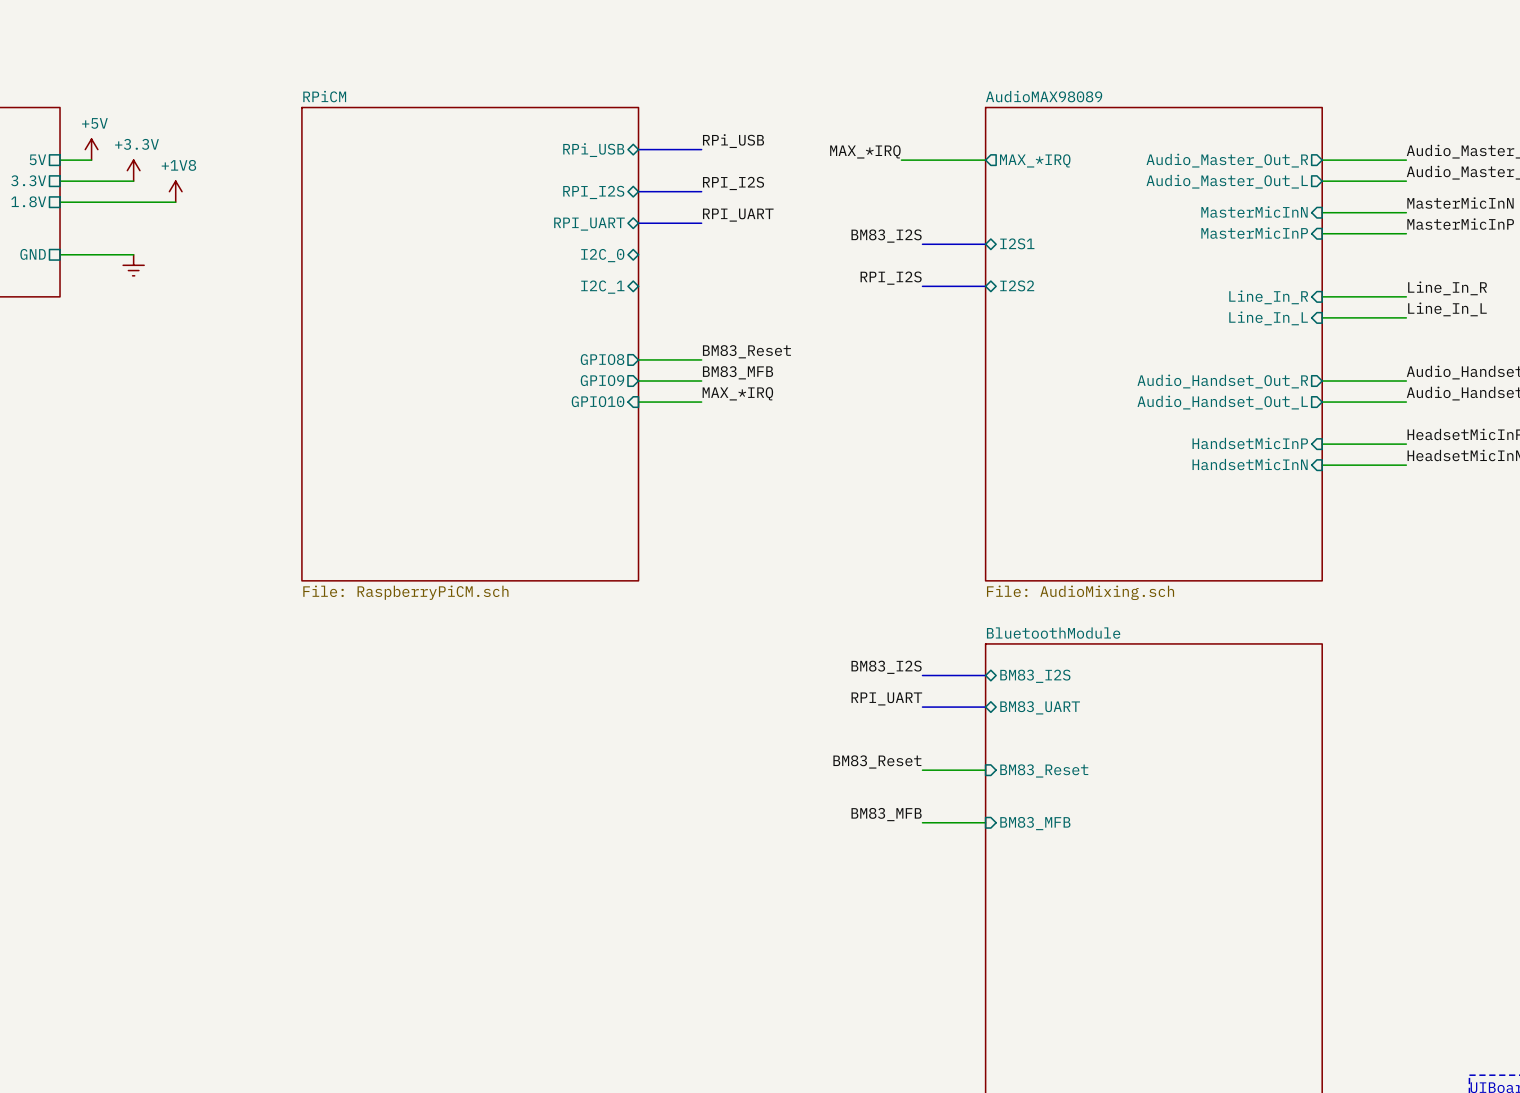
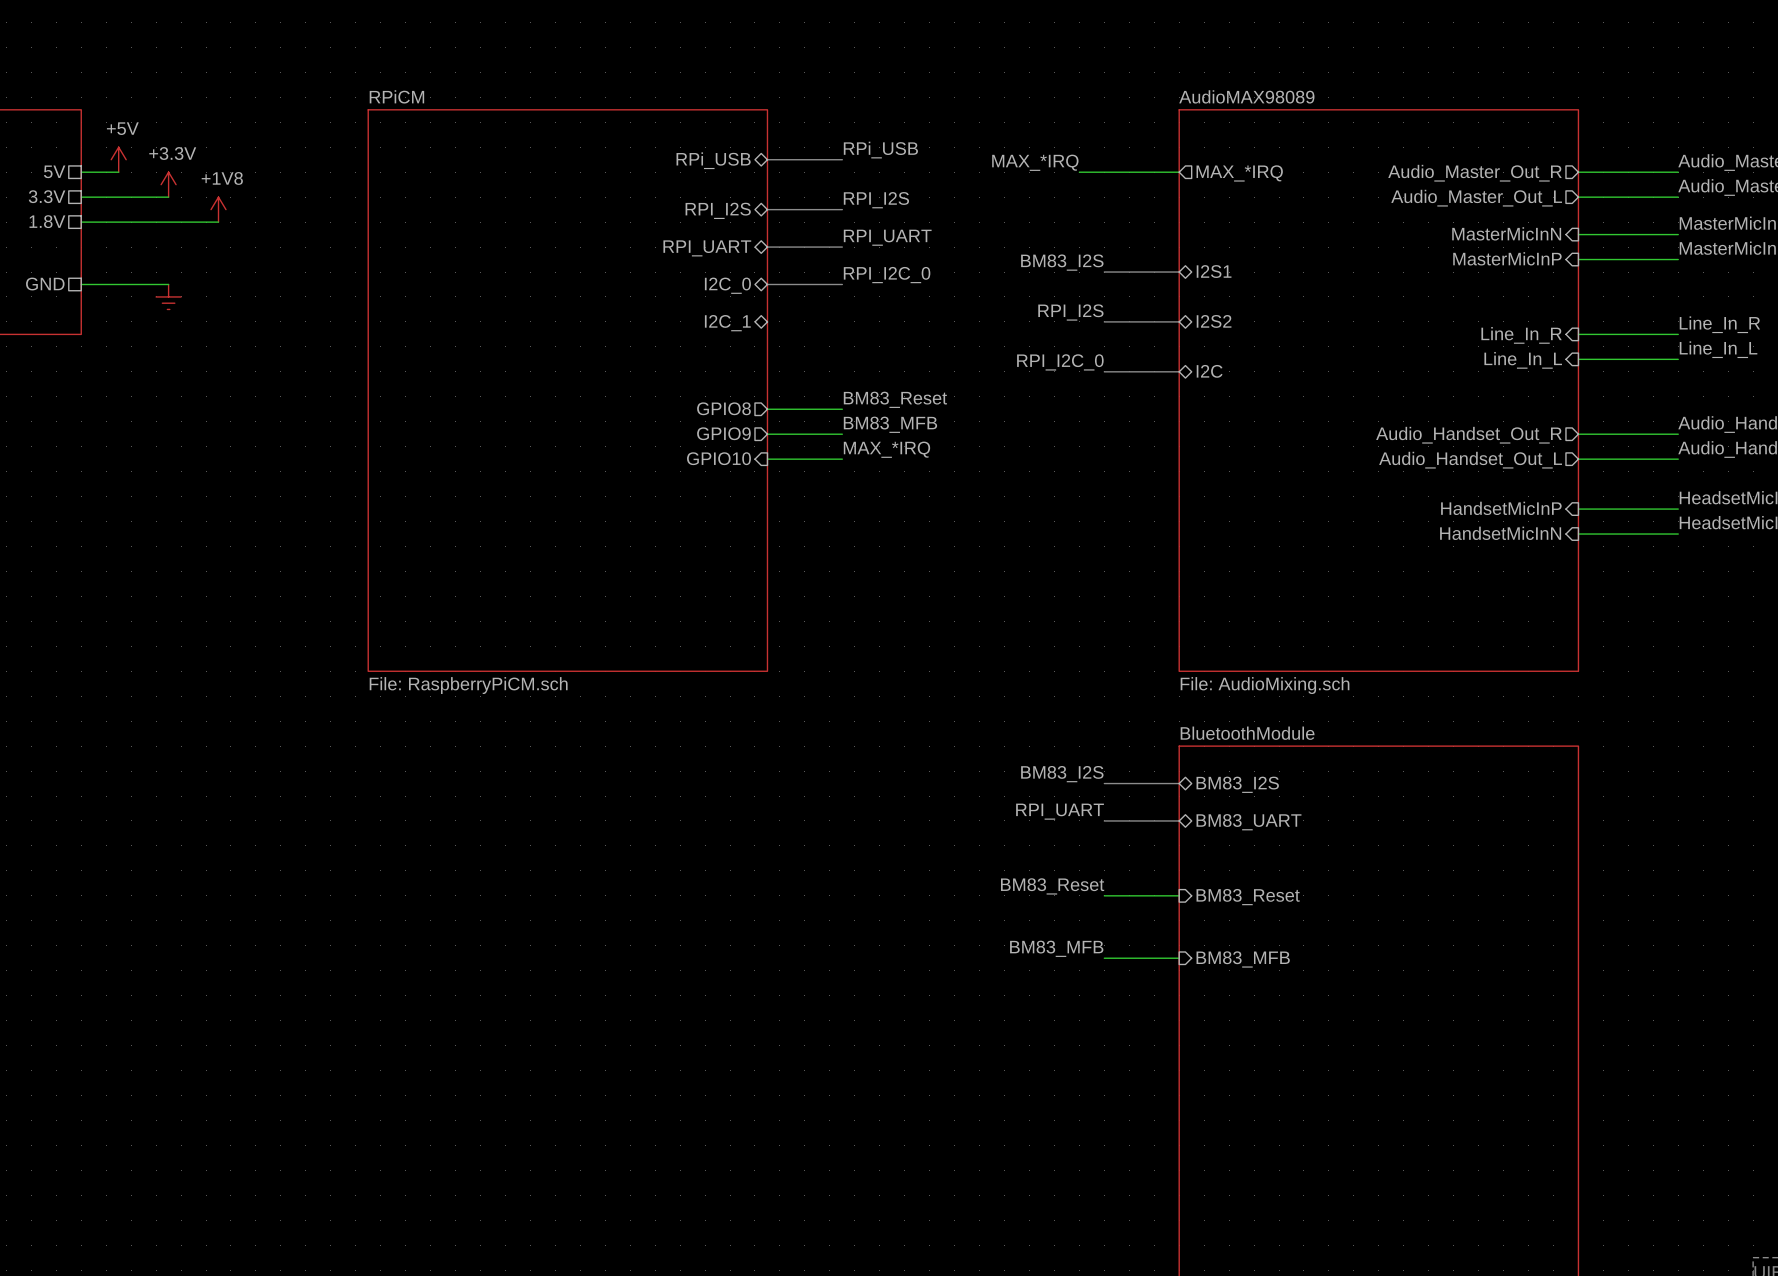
label: none -> RPI_I2C_0 (887, 275)
bus: none -> (767, 284) (842, 284)
label: none -> RPI_I2C_0 (1060, 362)
bus: none -> (1104, 371) (1179, 371)
sheet pin: none -> I2C (1209, 371)

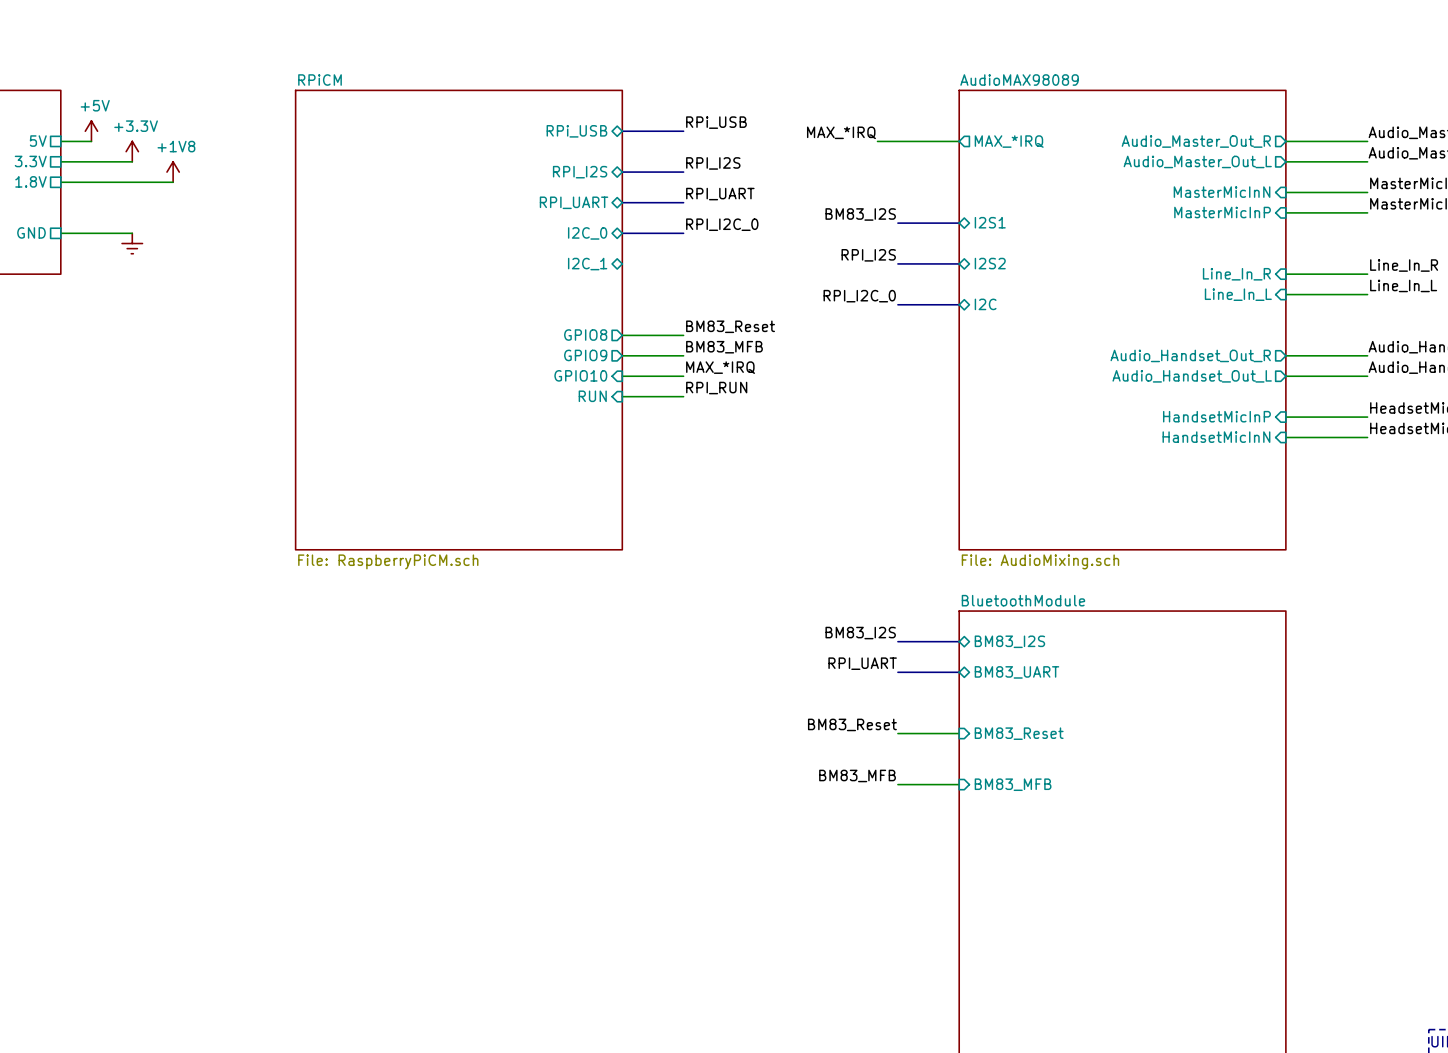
label: none -> RPI_RUN (716, 388)
sheet pin: none -> RUN (592, 396)
wire: none -> (622, 396) (683, 396)

